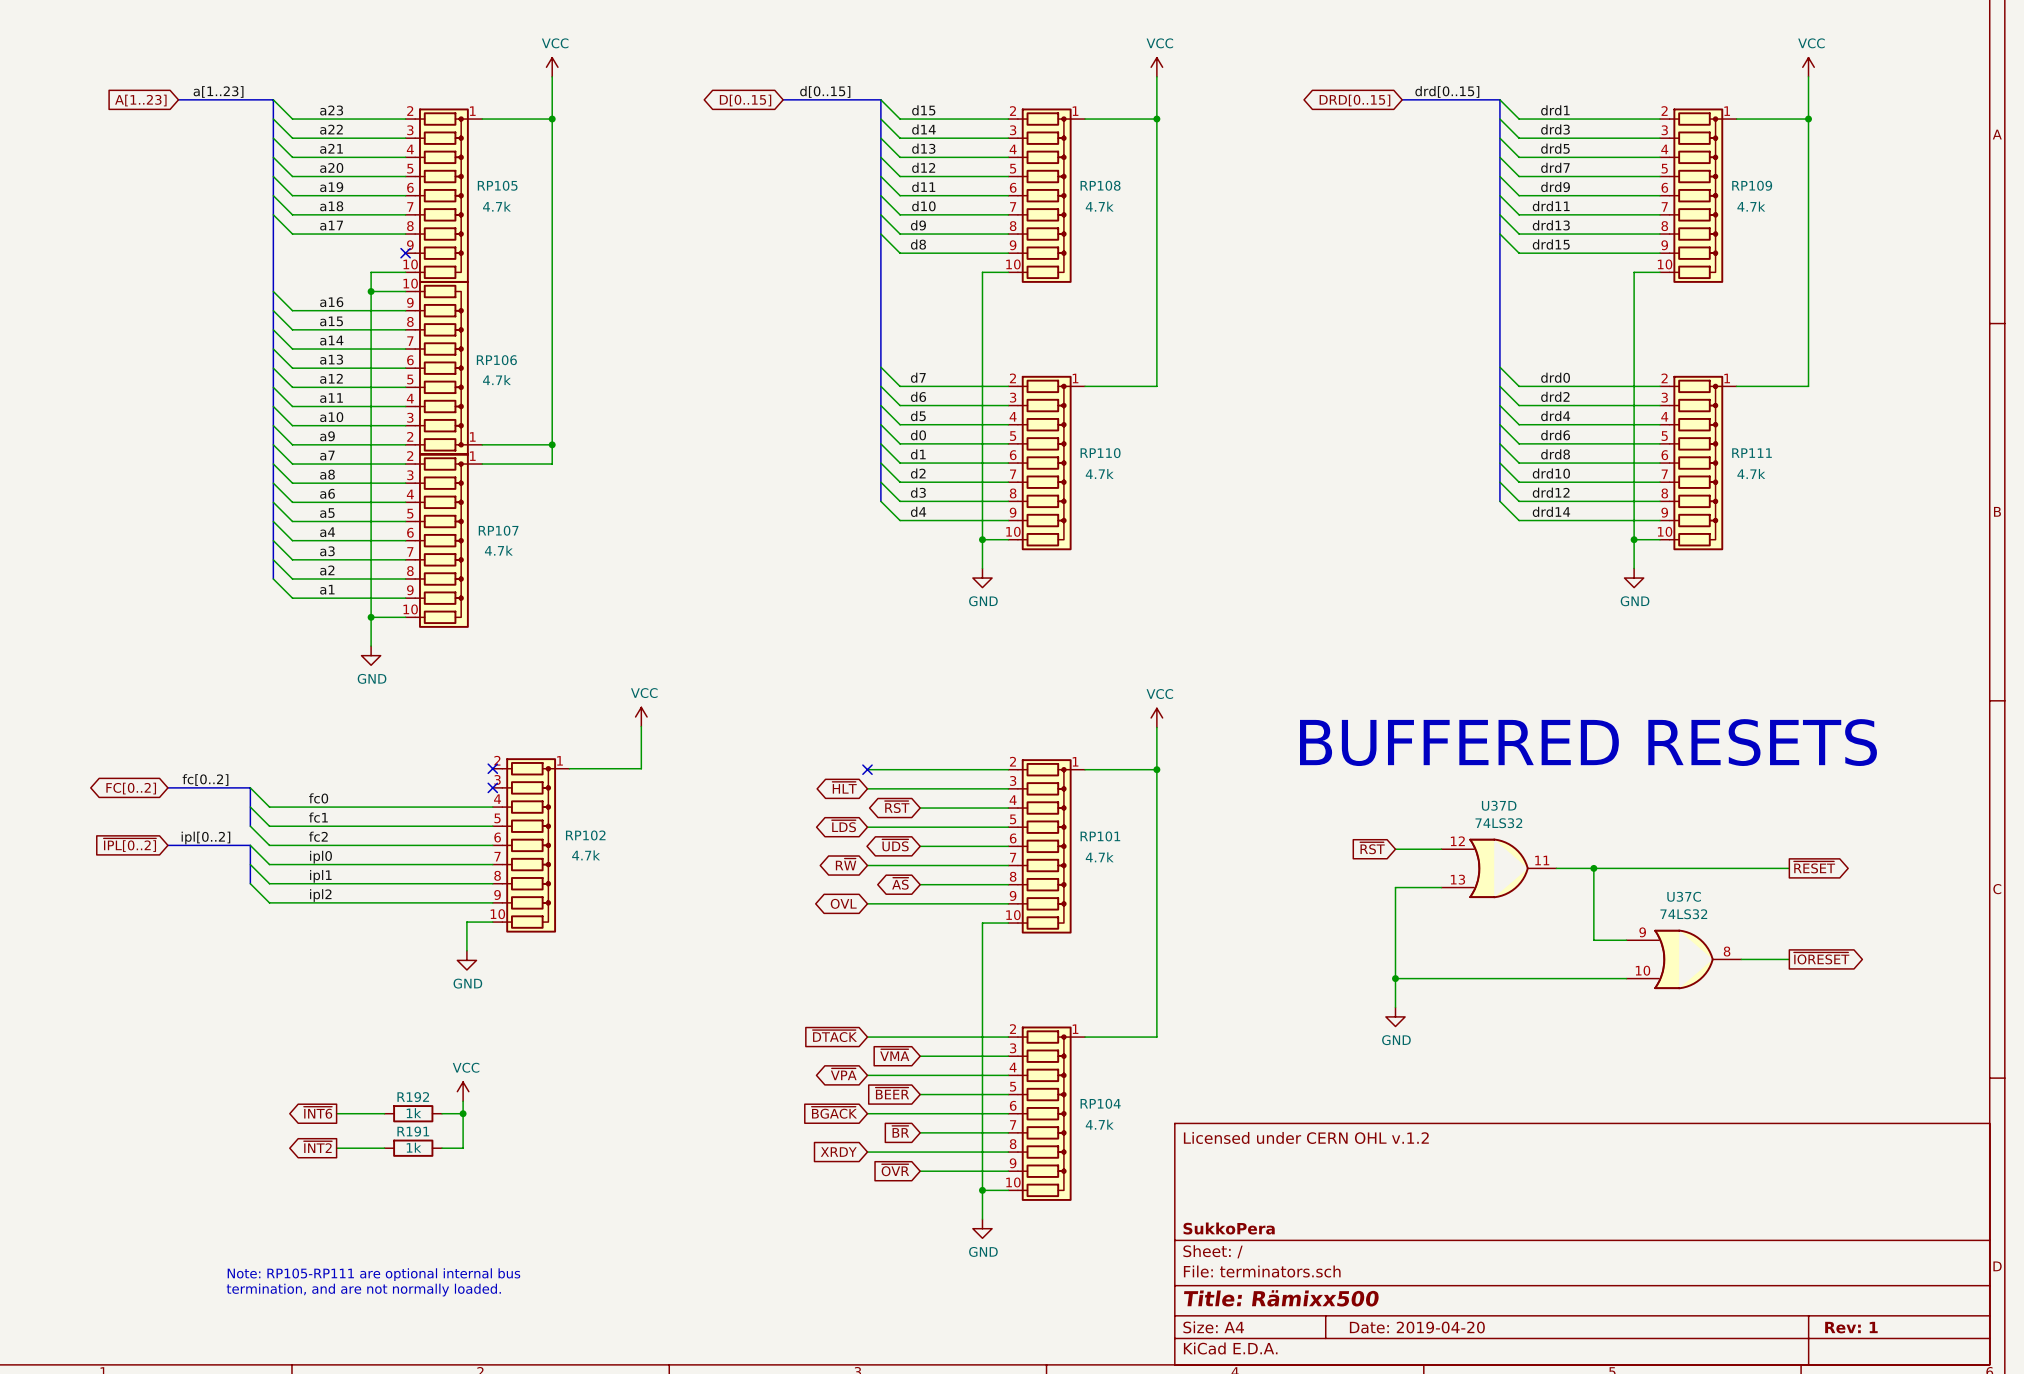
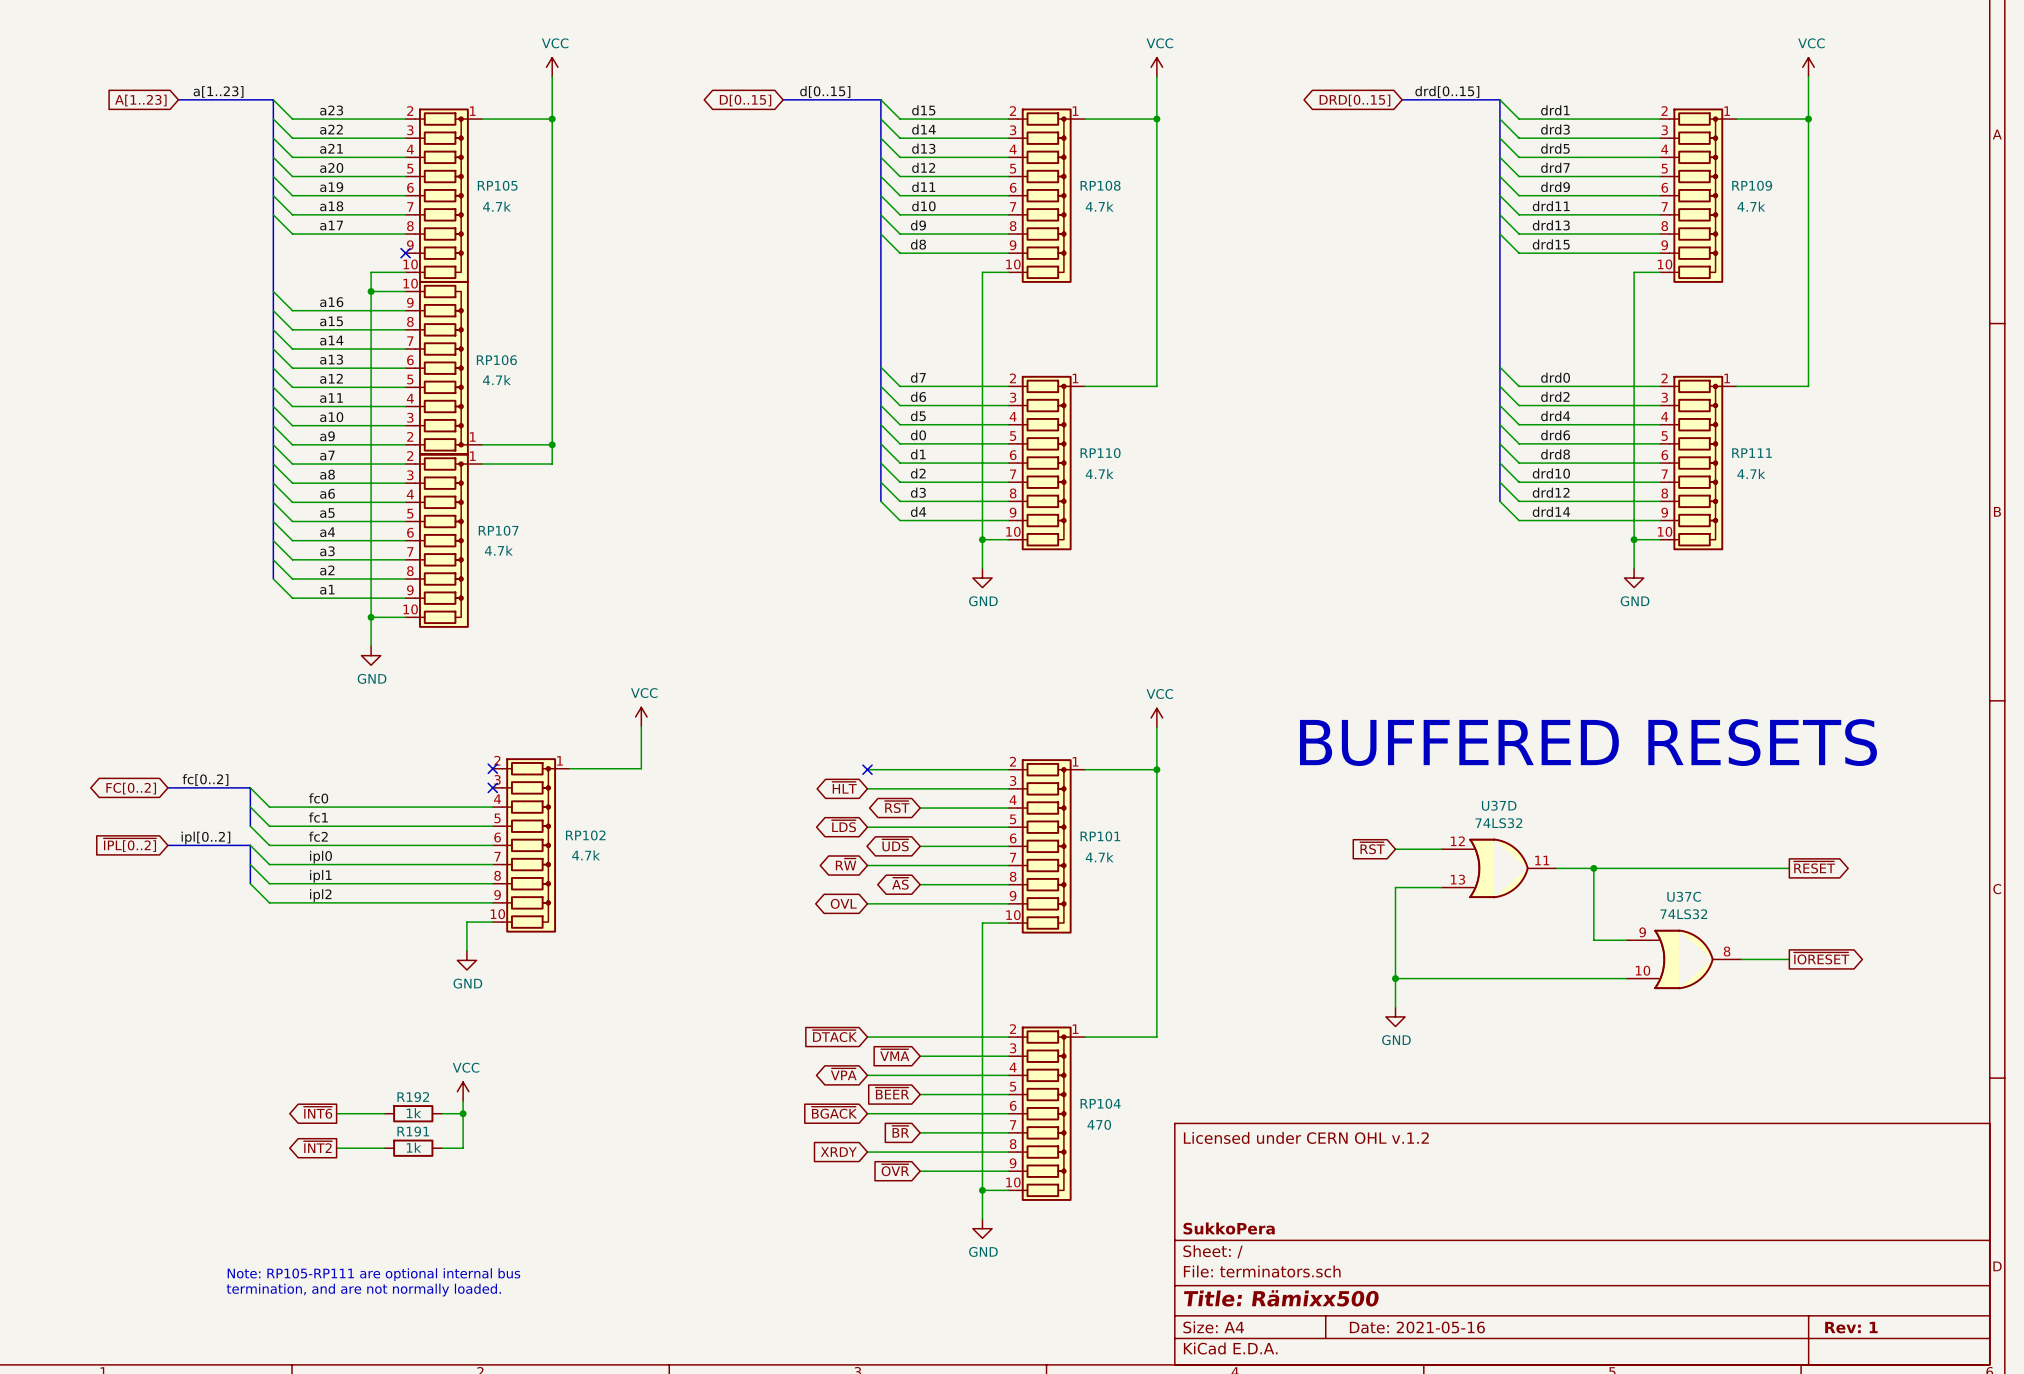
RP104 value: 4.7k (1099, 1124) -> 470 (1099, 1124)
title block: Date: 2019-04-20 (1417, 1327) -> Date: 2021-05-16 (1417, 1327)

